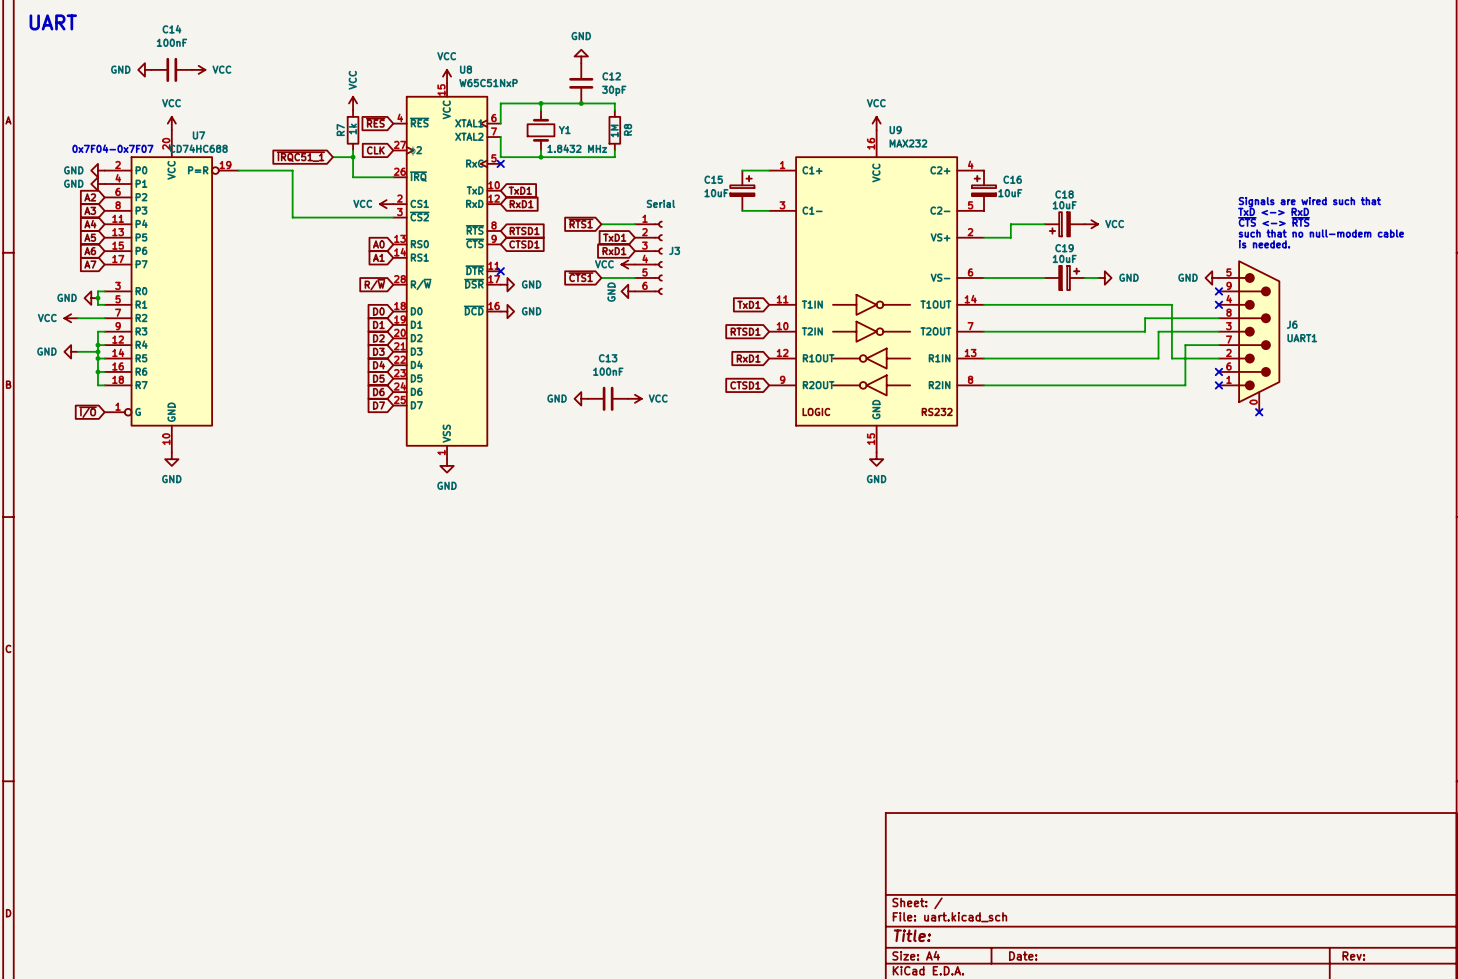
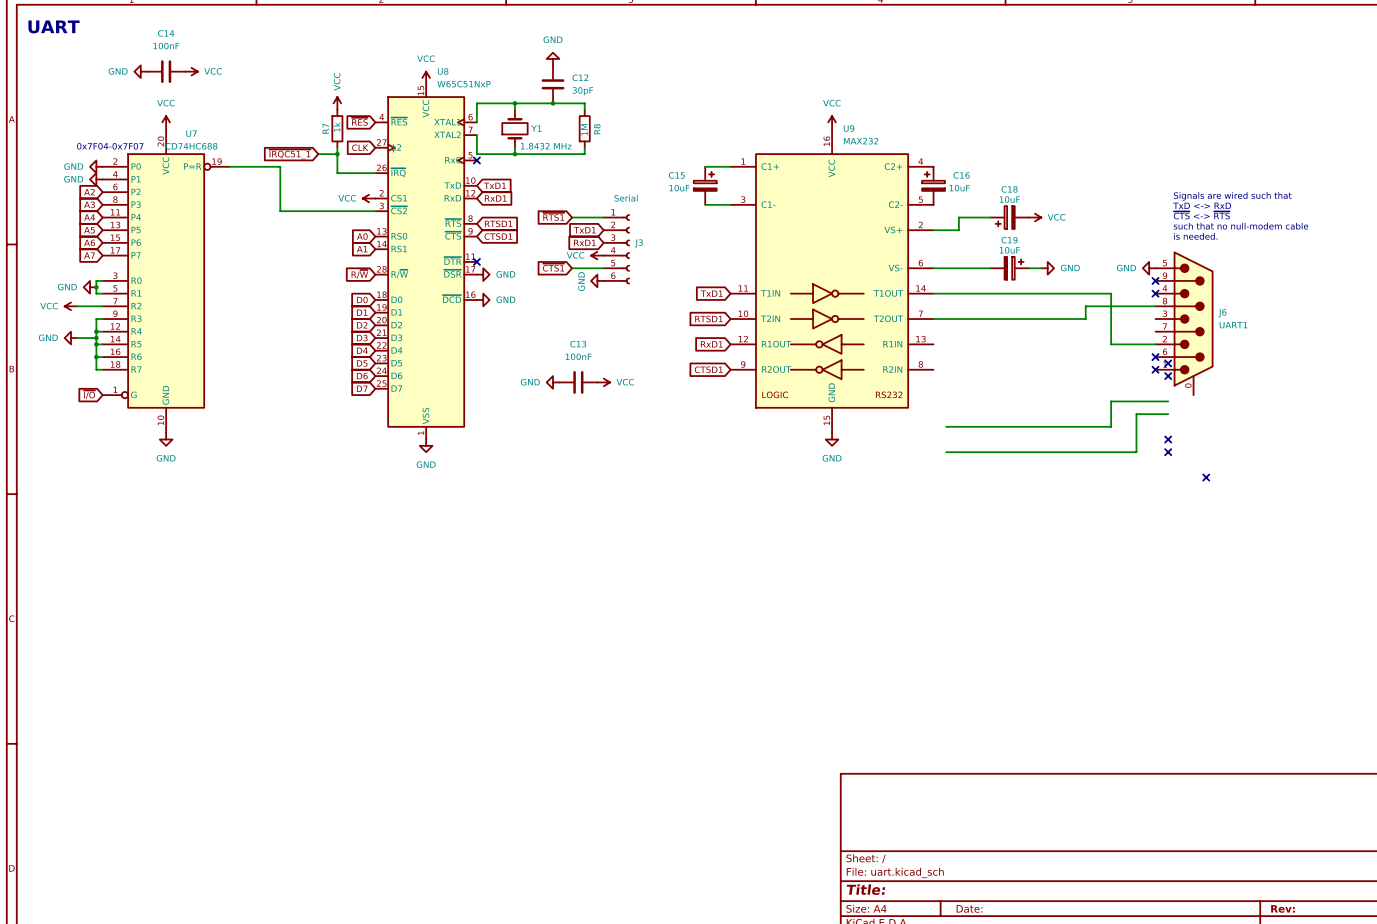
wire: (1218, 331) (1158, 331) (1158, 358) (984, 358) -> (1168, 401) (1111, 401) (1111, 426) (946, 426)
wire: (1218, 345) (1185, 345) (1185, 385) (984, 385) -> (1168, 414) (1136, 414) (1136, 452) (946, 452)
no-connect mark: none -> (1168, 363)
no-connect mark: none -> (1168, 376)
no-connect mark: (1259, 412) -> none
no-connect mark: none -> (1168, 439)
no-connect mark: none -> (1168, 452)
no-connect mark: none -> (1206, 477)

